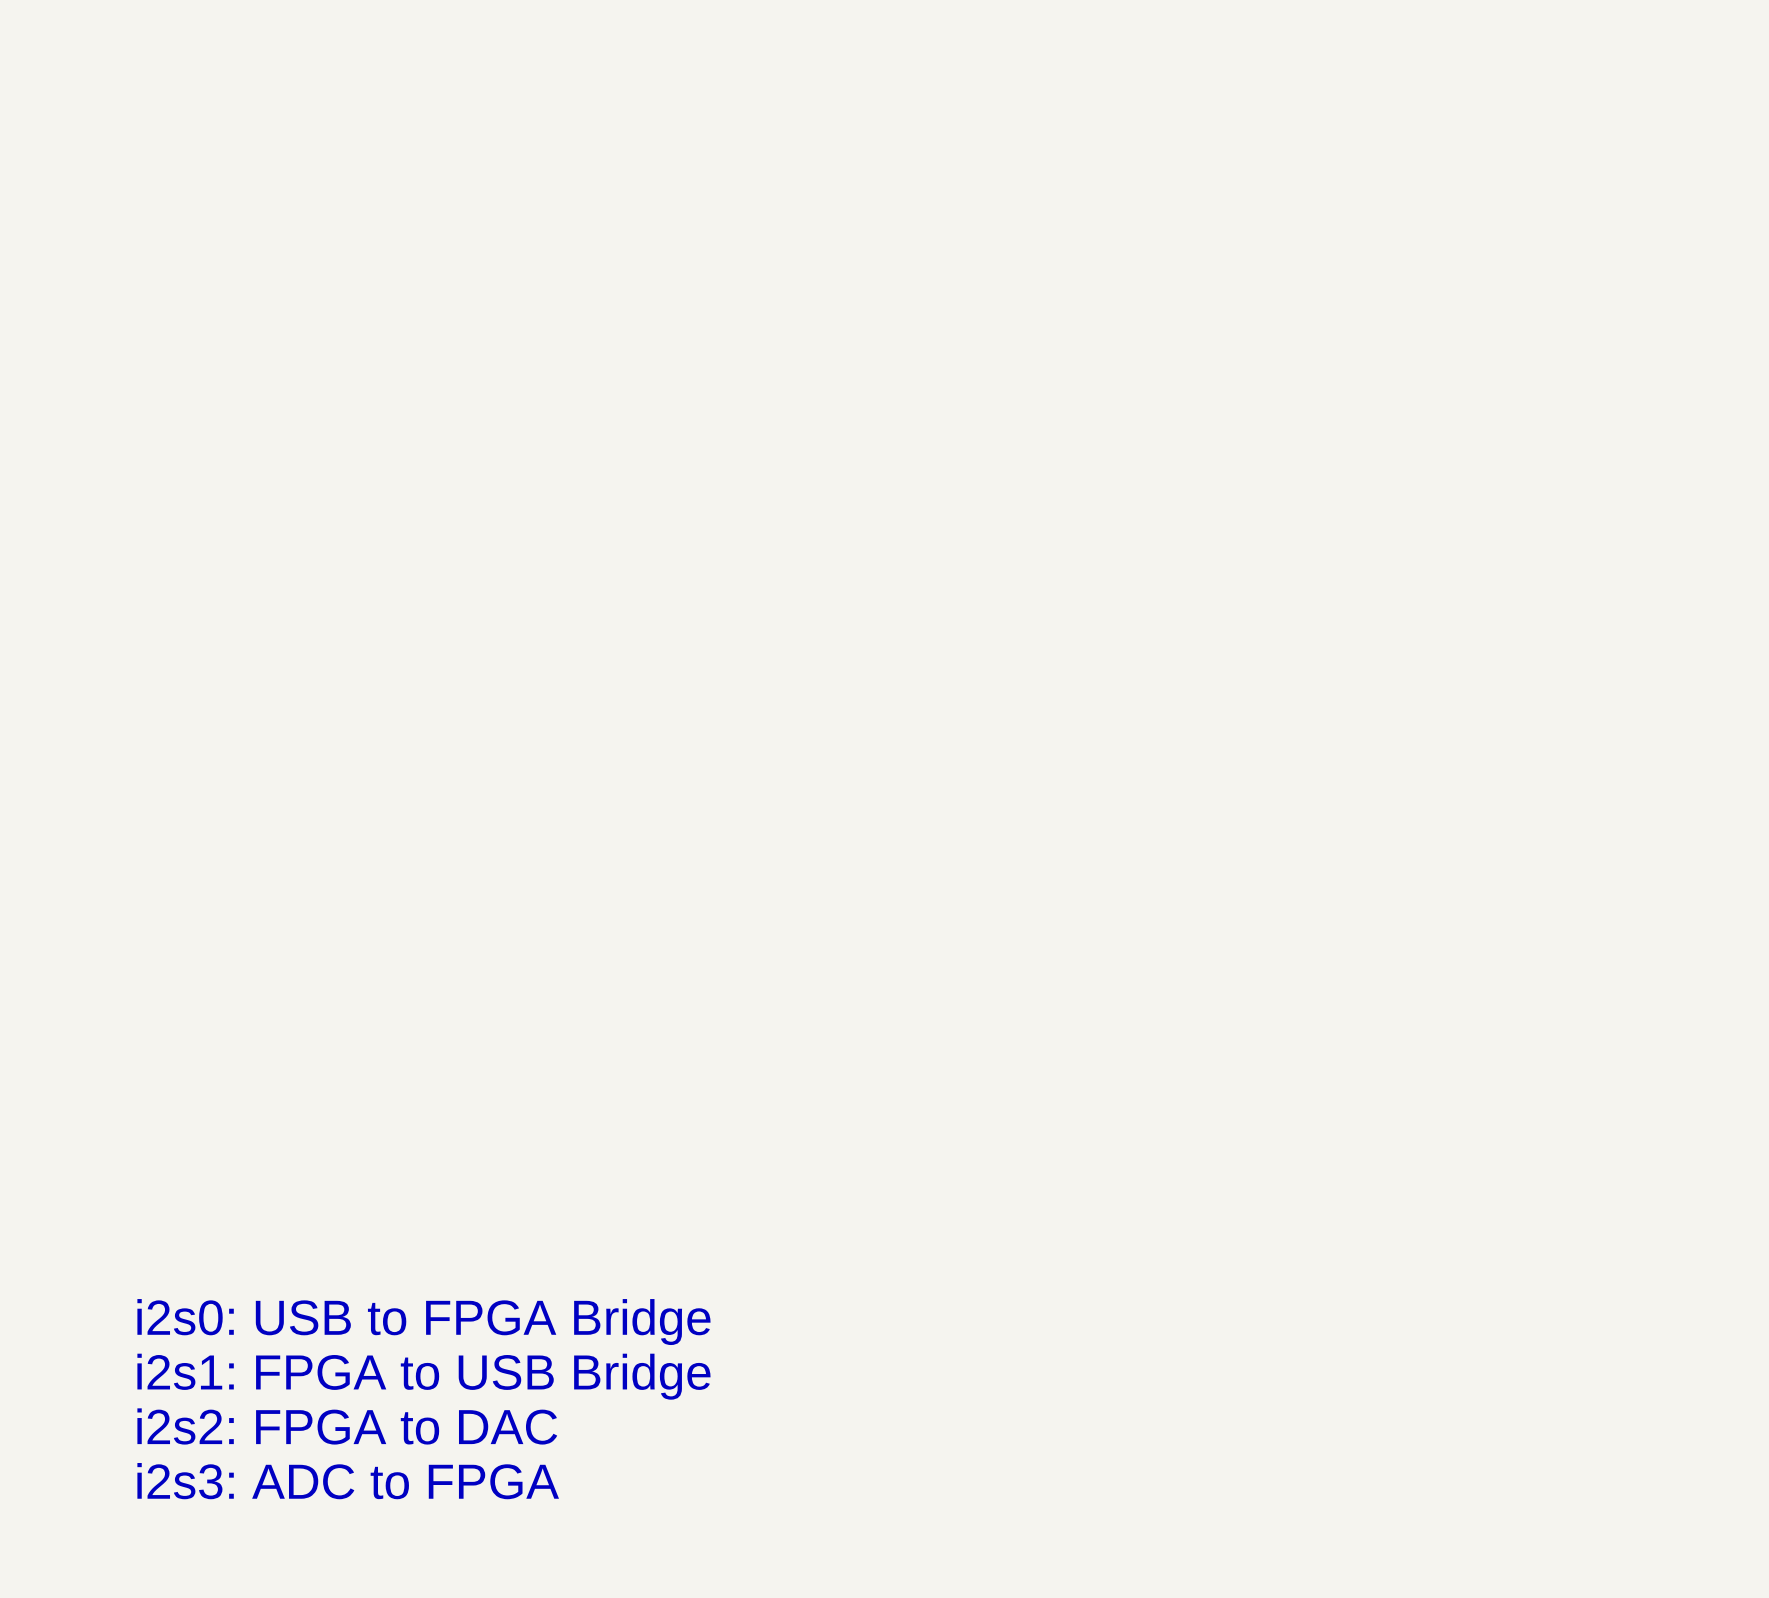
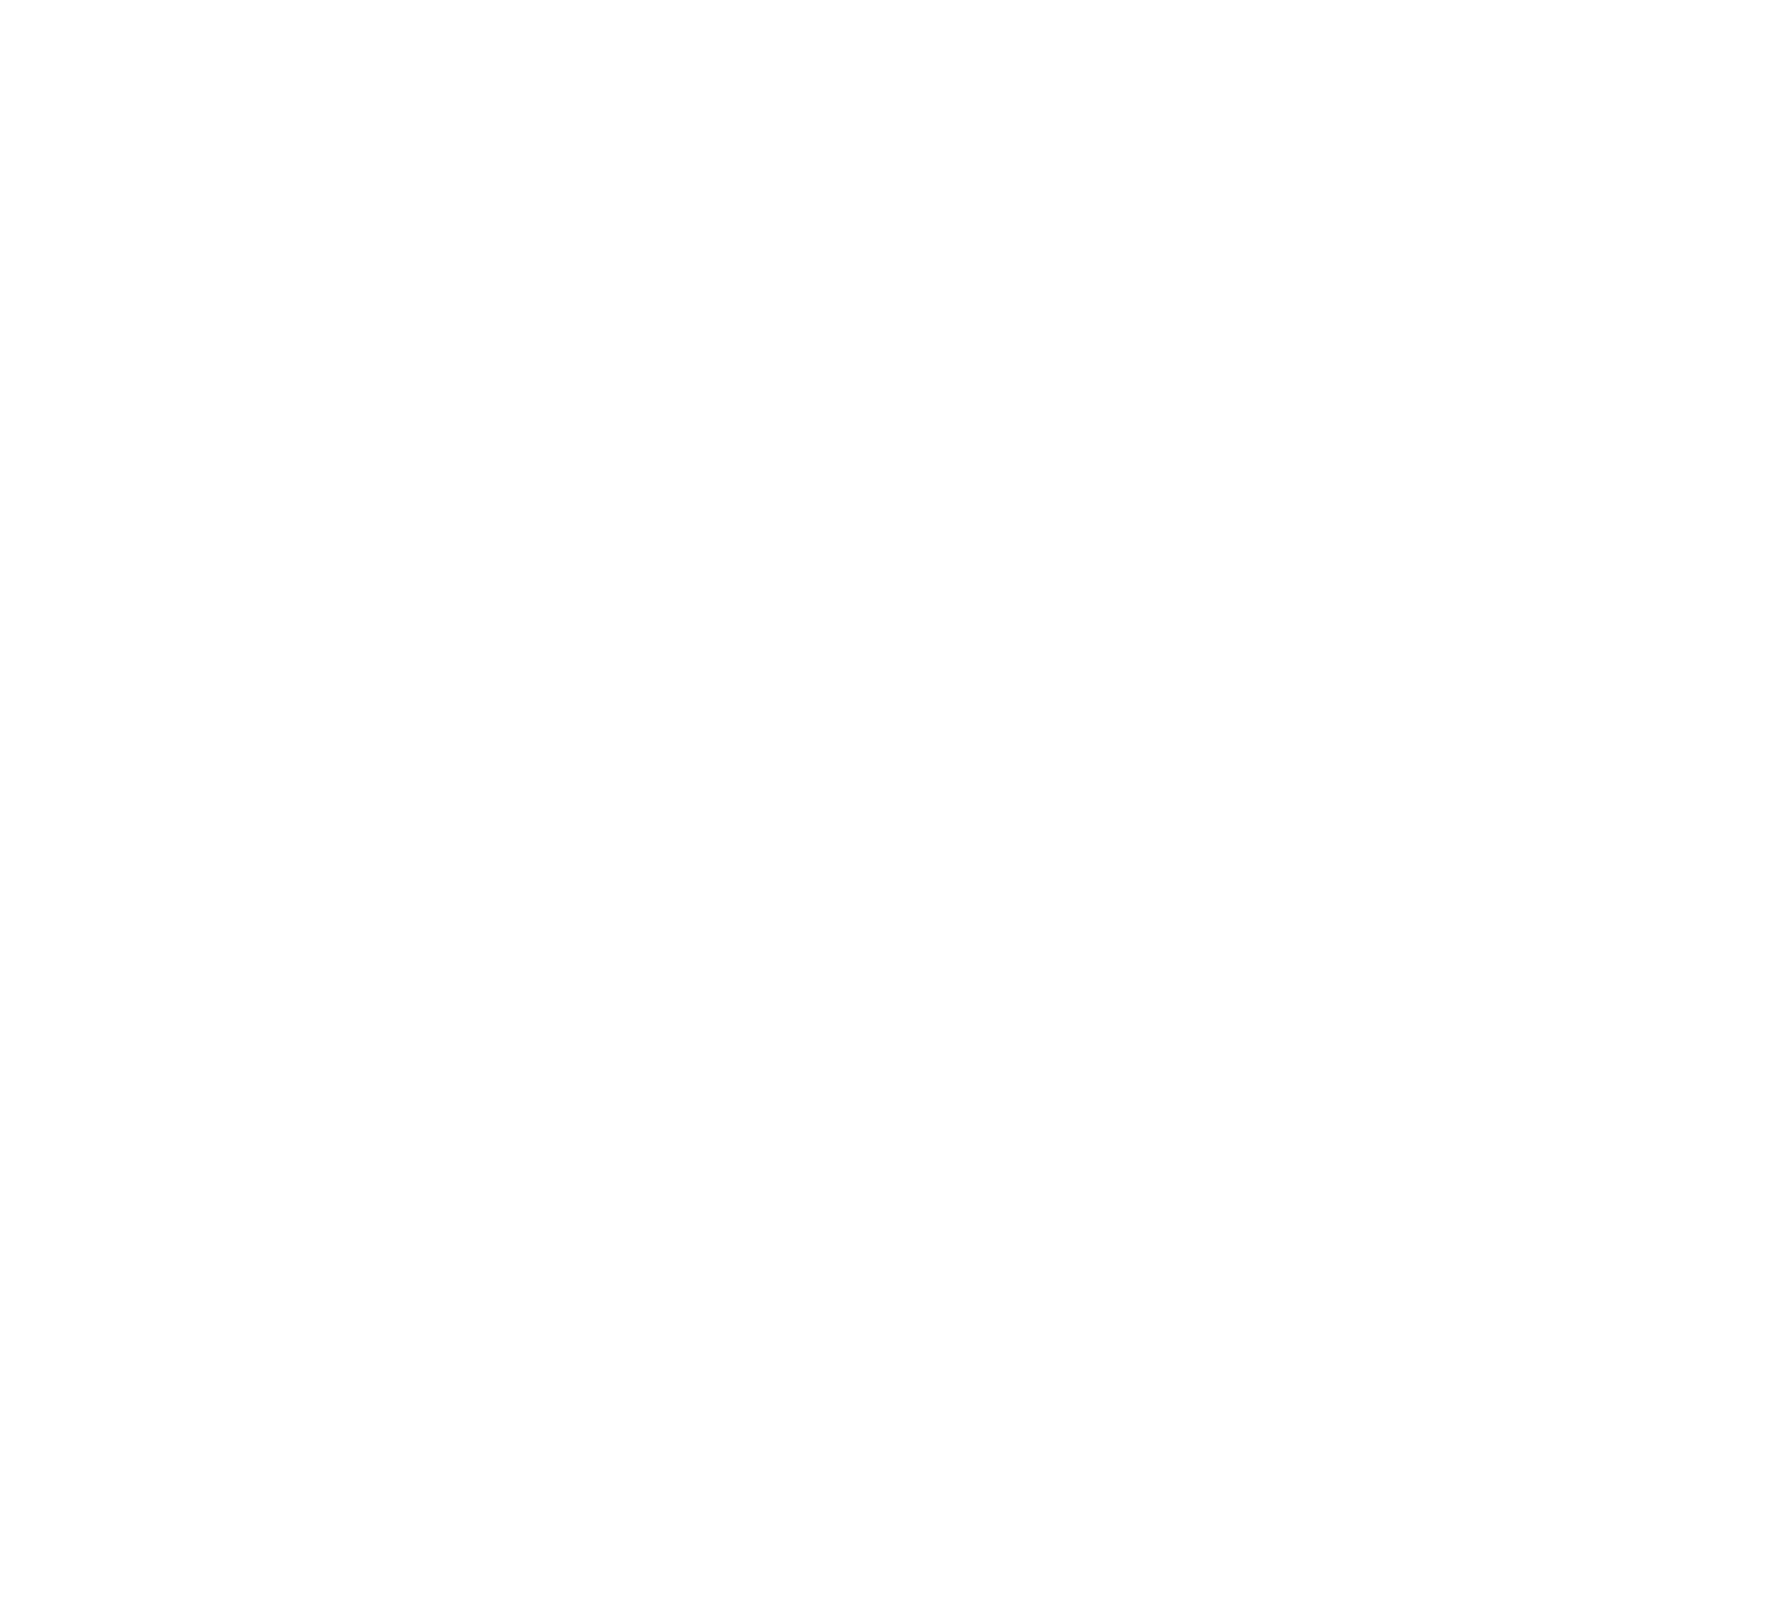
text: i2s0: USB to FPGA Bridge (423, 1322) -> none
text: i2s1: FPGA to USB Bridge (423, 1376) -> none
text: i2s2: FPGA to DAC (347, 1426) -> none
text: i2s3: ADC to FPGA (348, 1481) -> none

